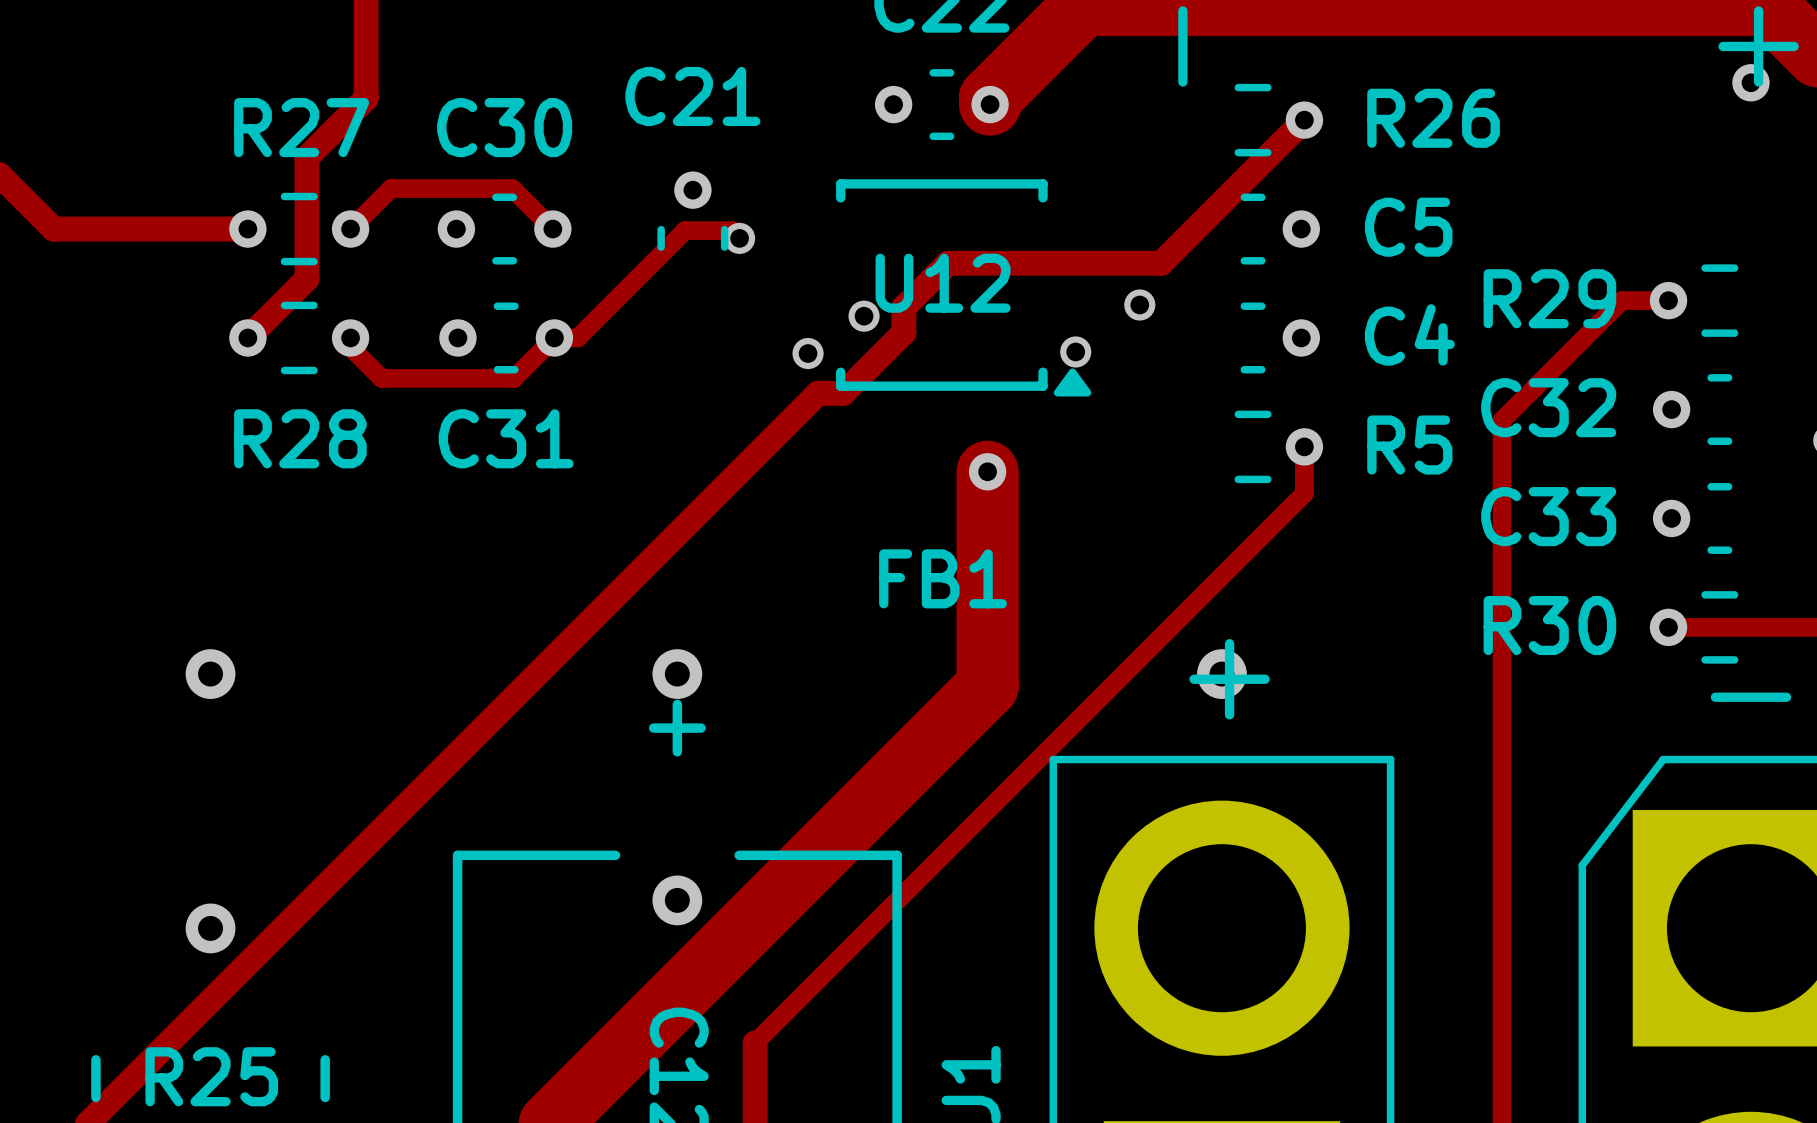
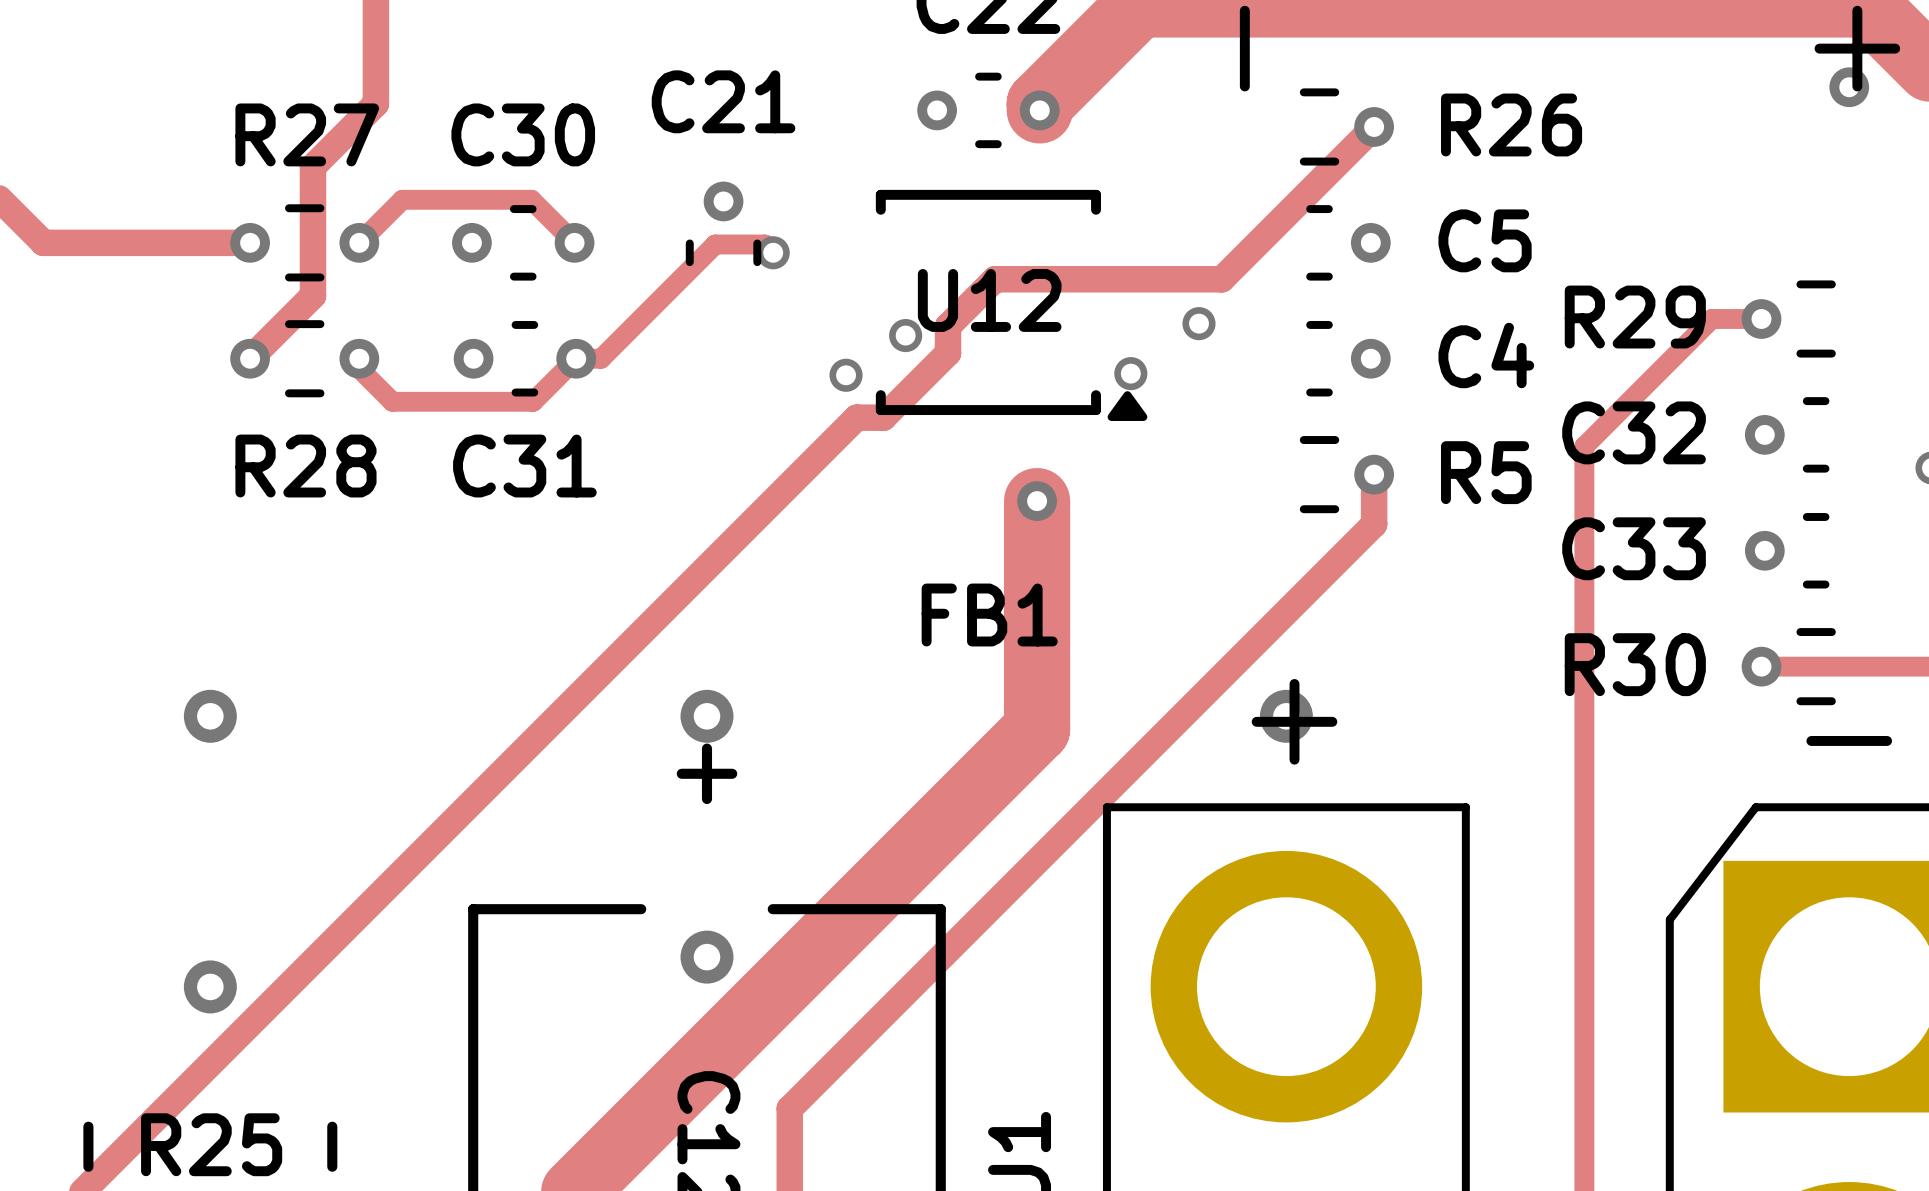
track width: thin (1304, 446) (1304, 493) (755, 1042) -> thick (1374, 474) (1374, 524) (789, 1108)

